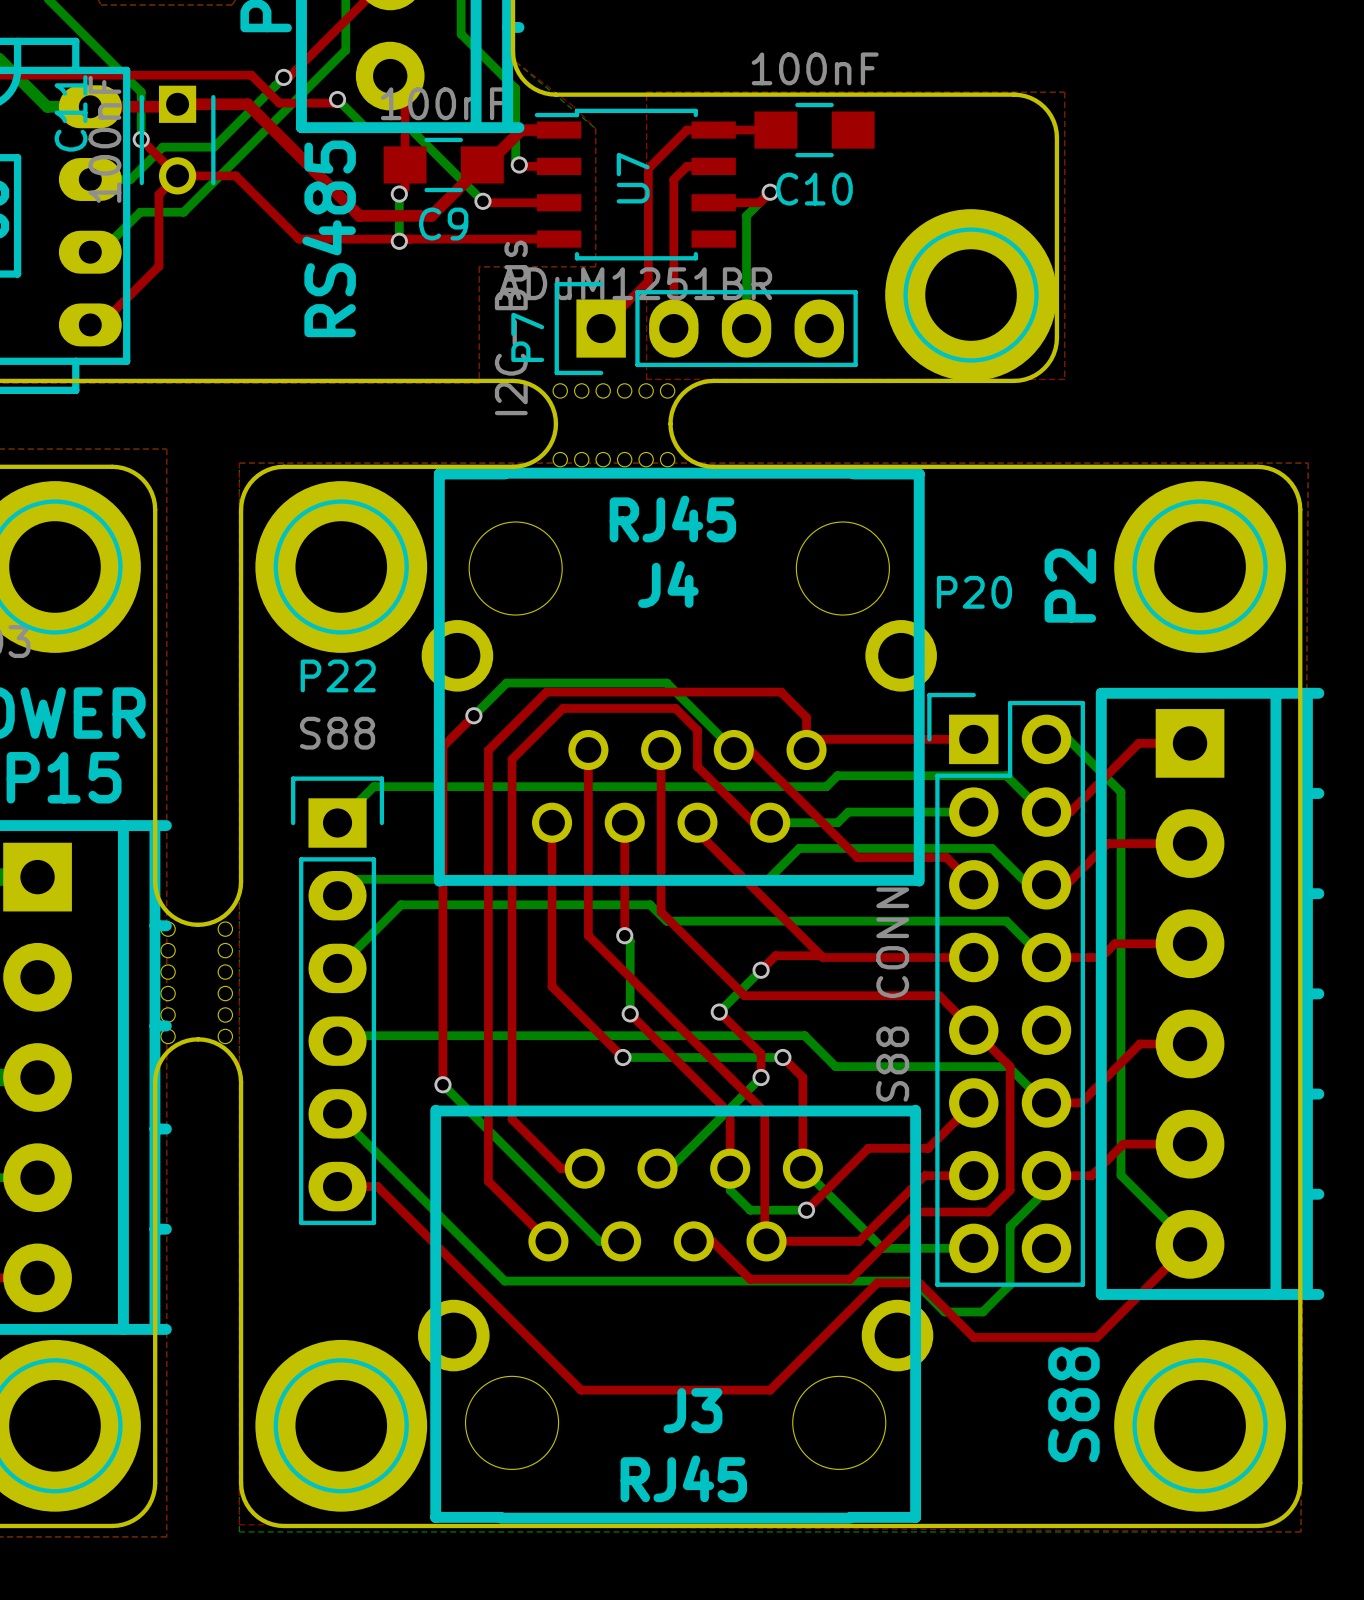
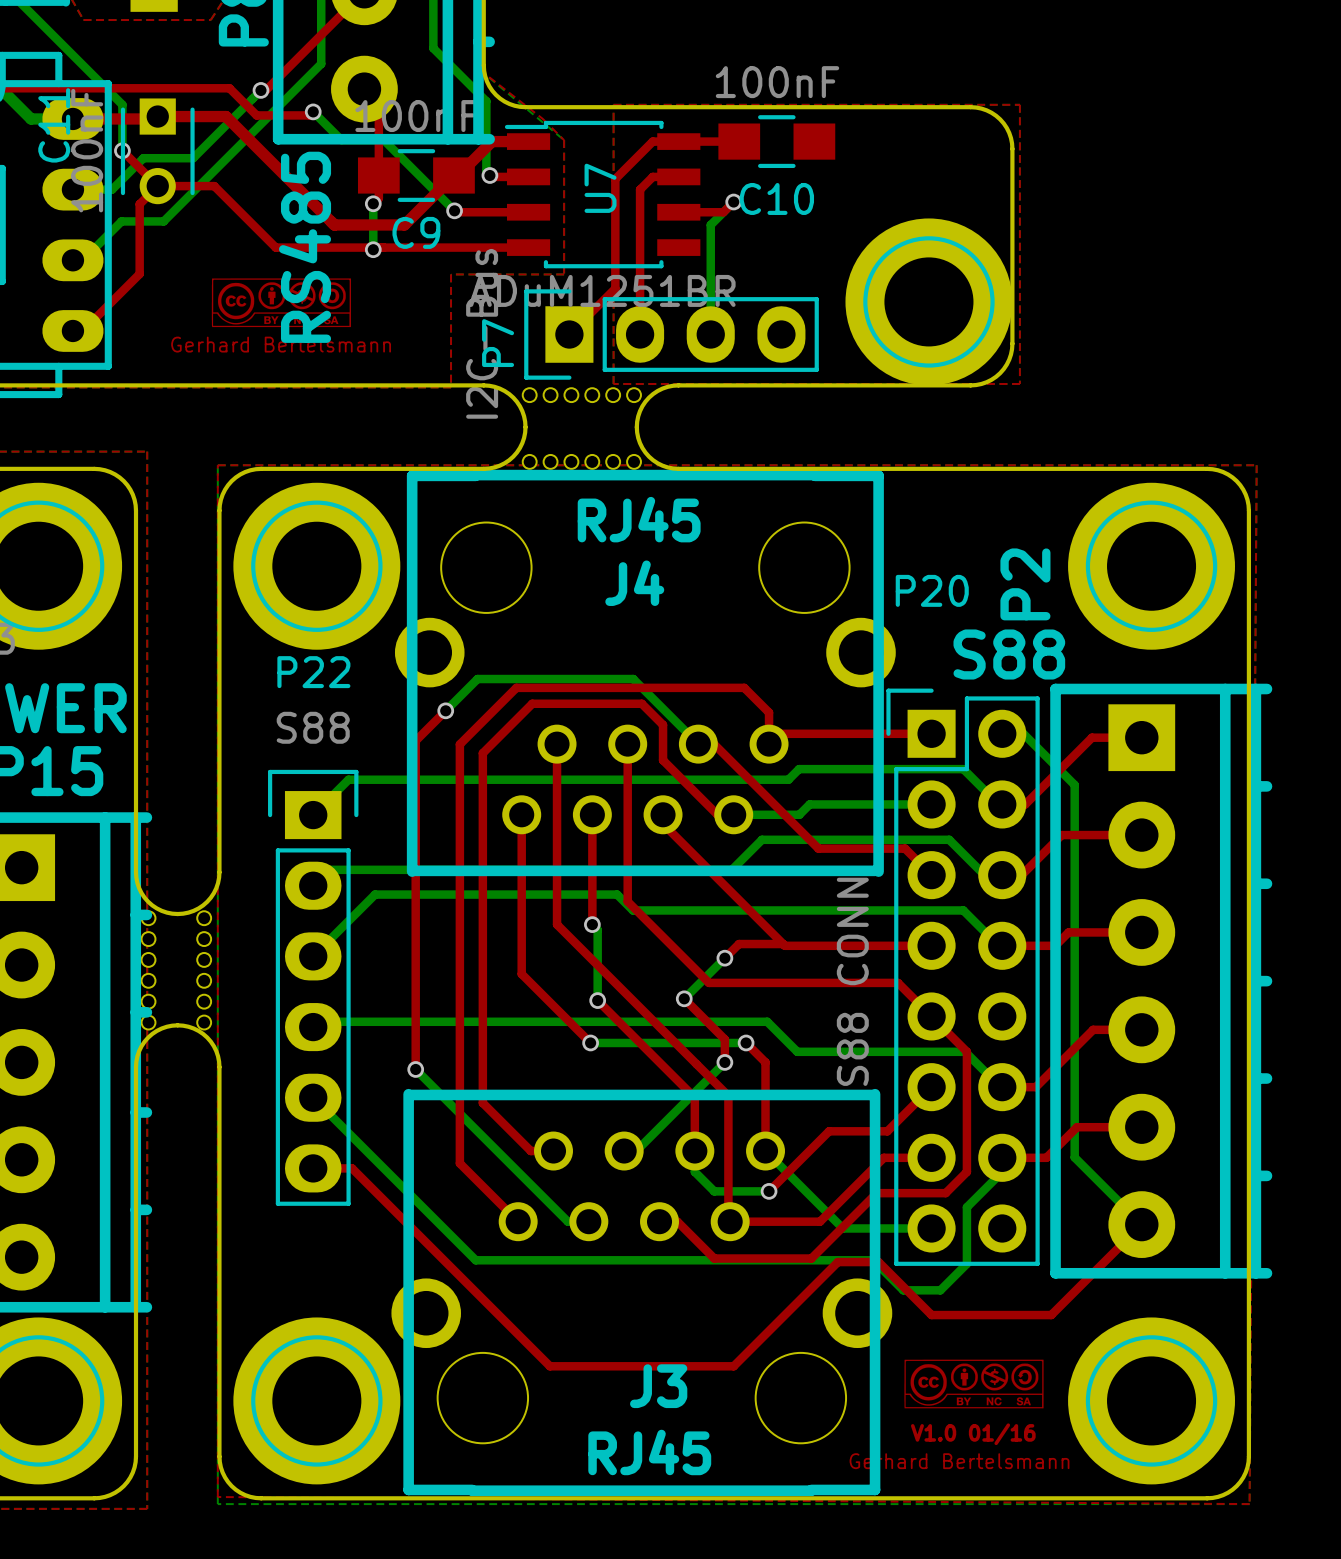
drawing: none -> [211, 278, 352, 328]
text: none -> Gerhard Bertelsmann (281, 344)
drawing: none -> [904, 1359, 1044, 1409]
P2 value rotation: 0° (1073, 1404) -> 90° clockwise (1009, 654)
P2 value position: S88 (1073, 1404) -> S88 (1009, 654)
text: none -> V1.0 01/16 (973, 1434)
text: none -> Gerhard Bertelsmann (959, 1461)

